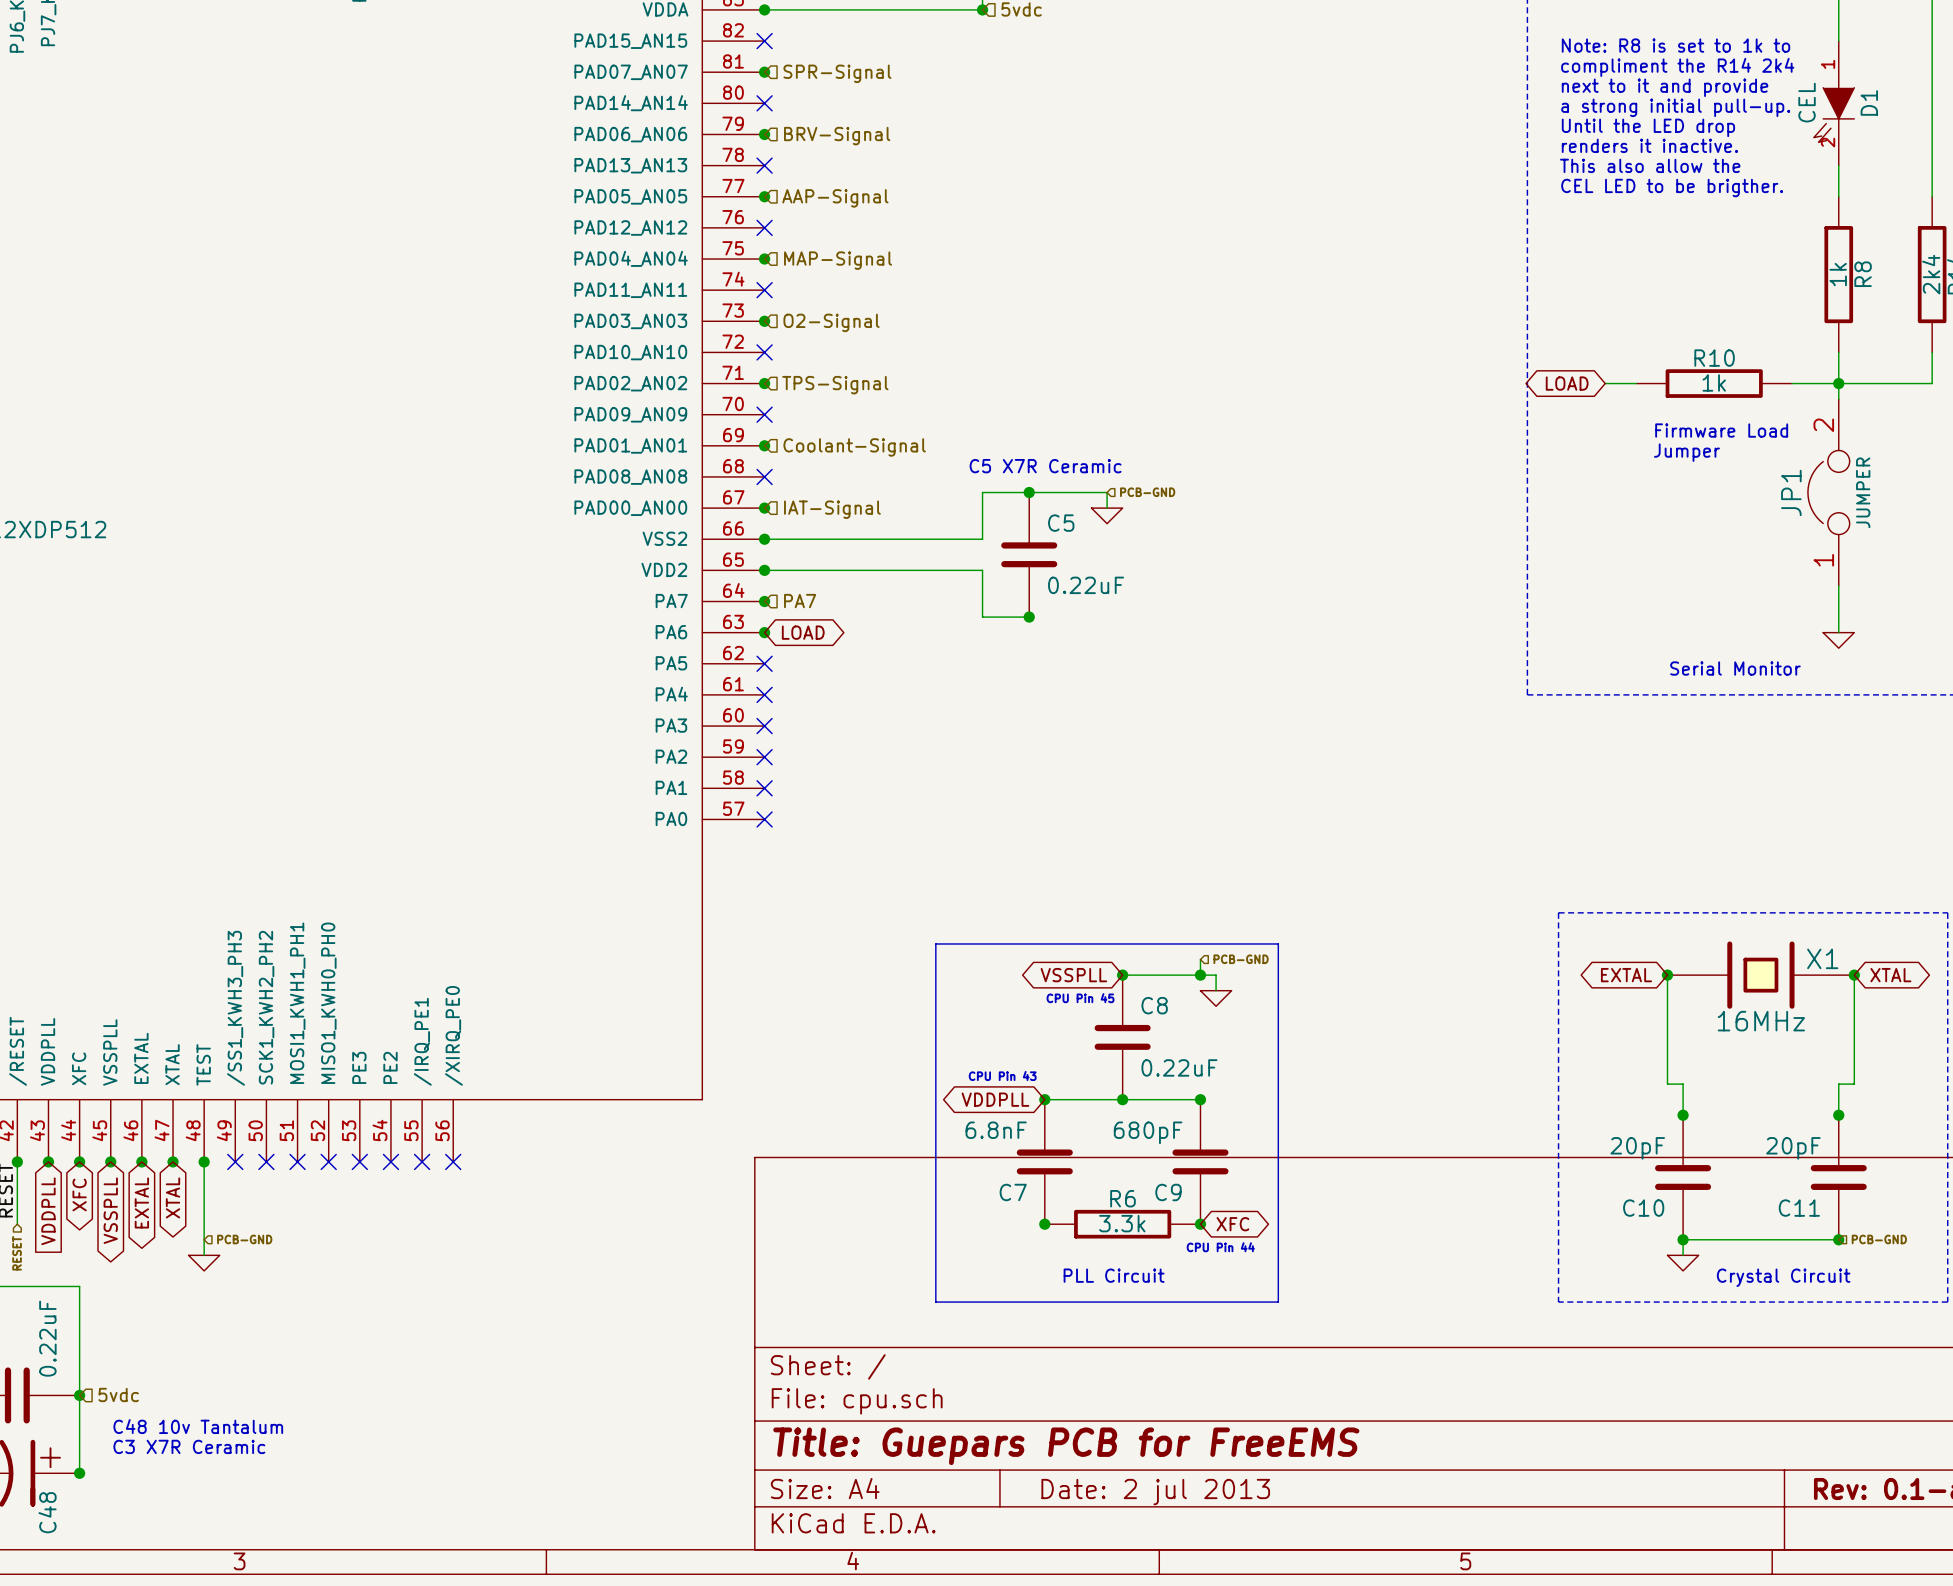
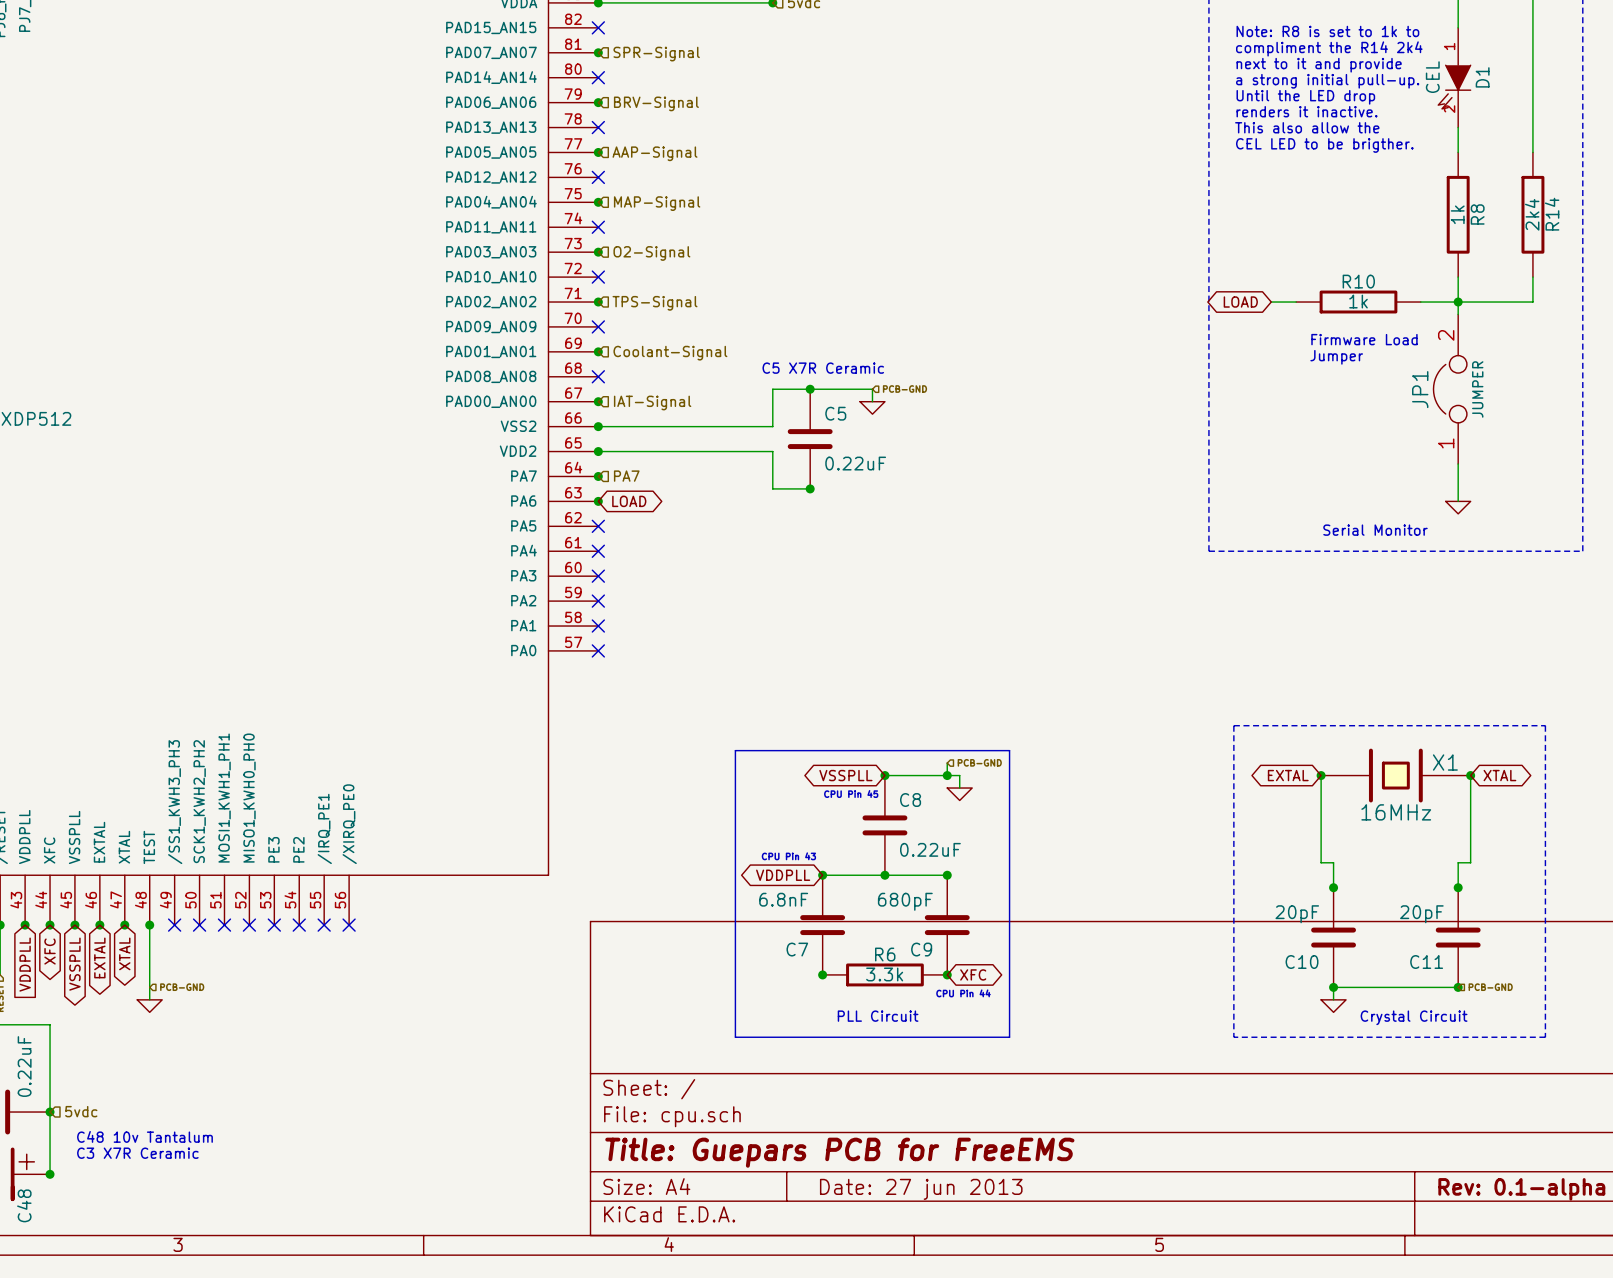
title block: Date: 2 jul 2013 (1155, 1492) -> Date: 27 jun 2013 (921, 1189)

